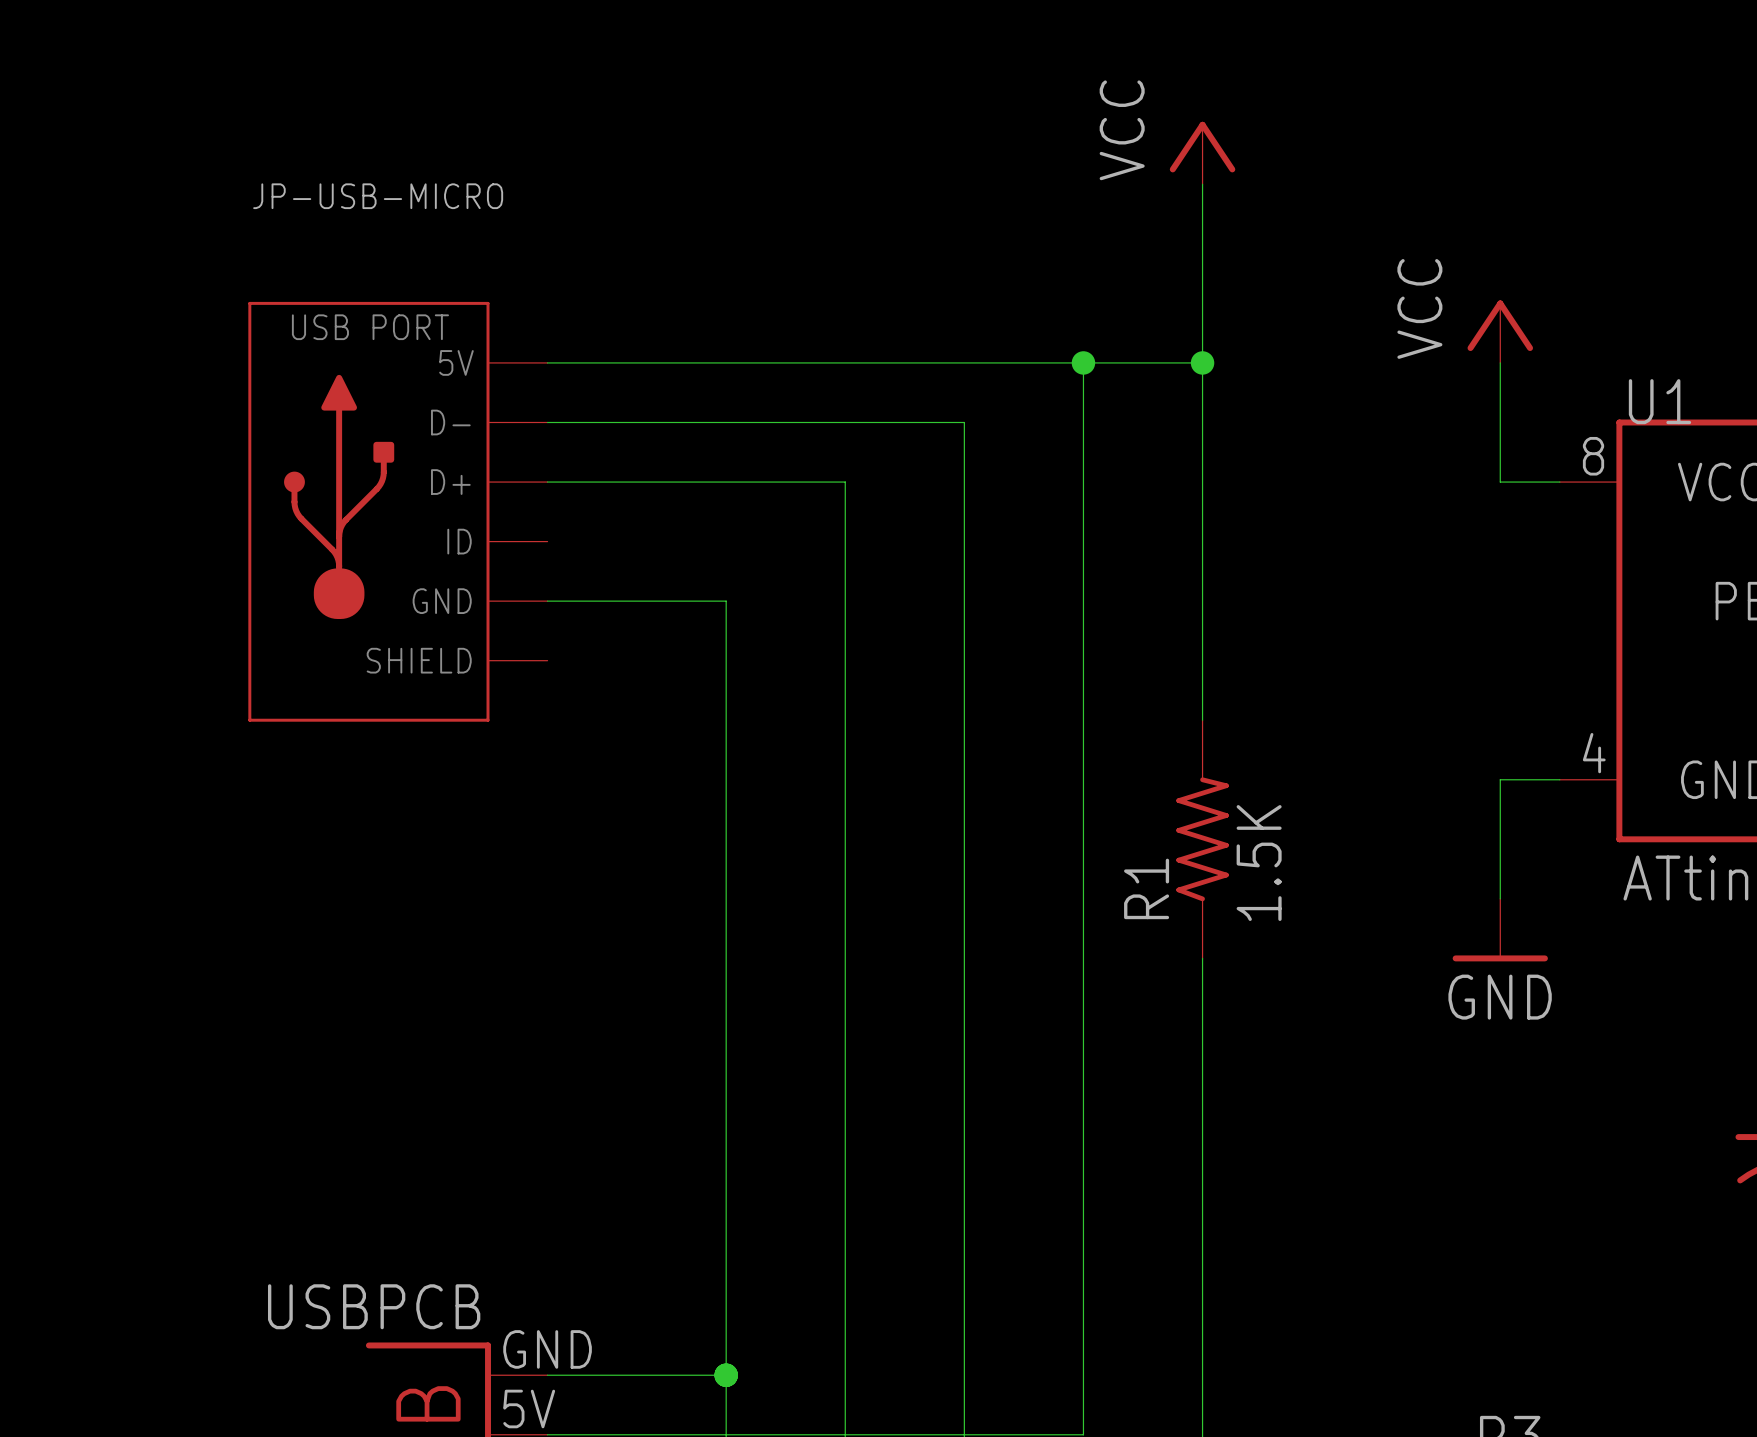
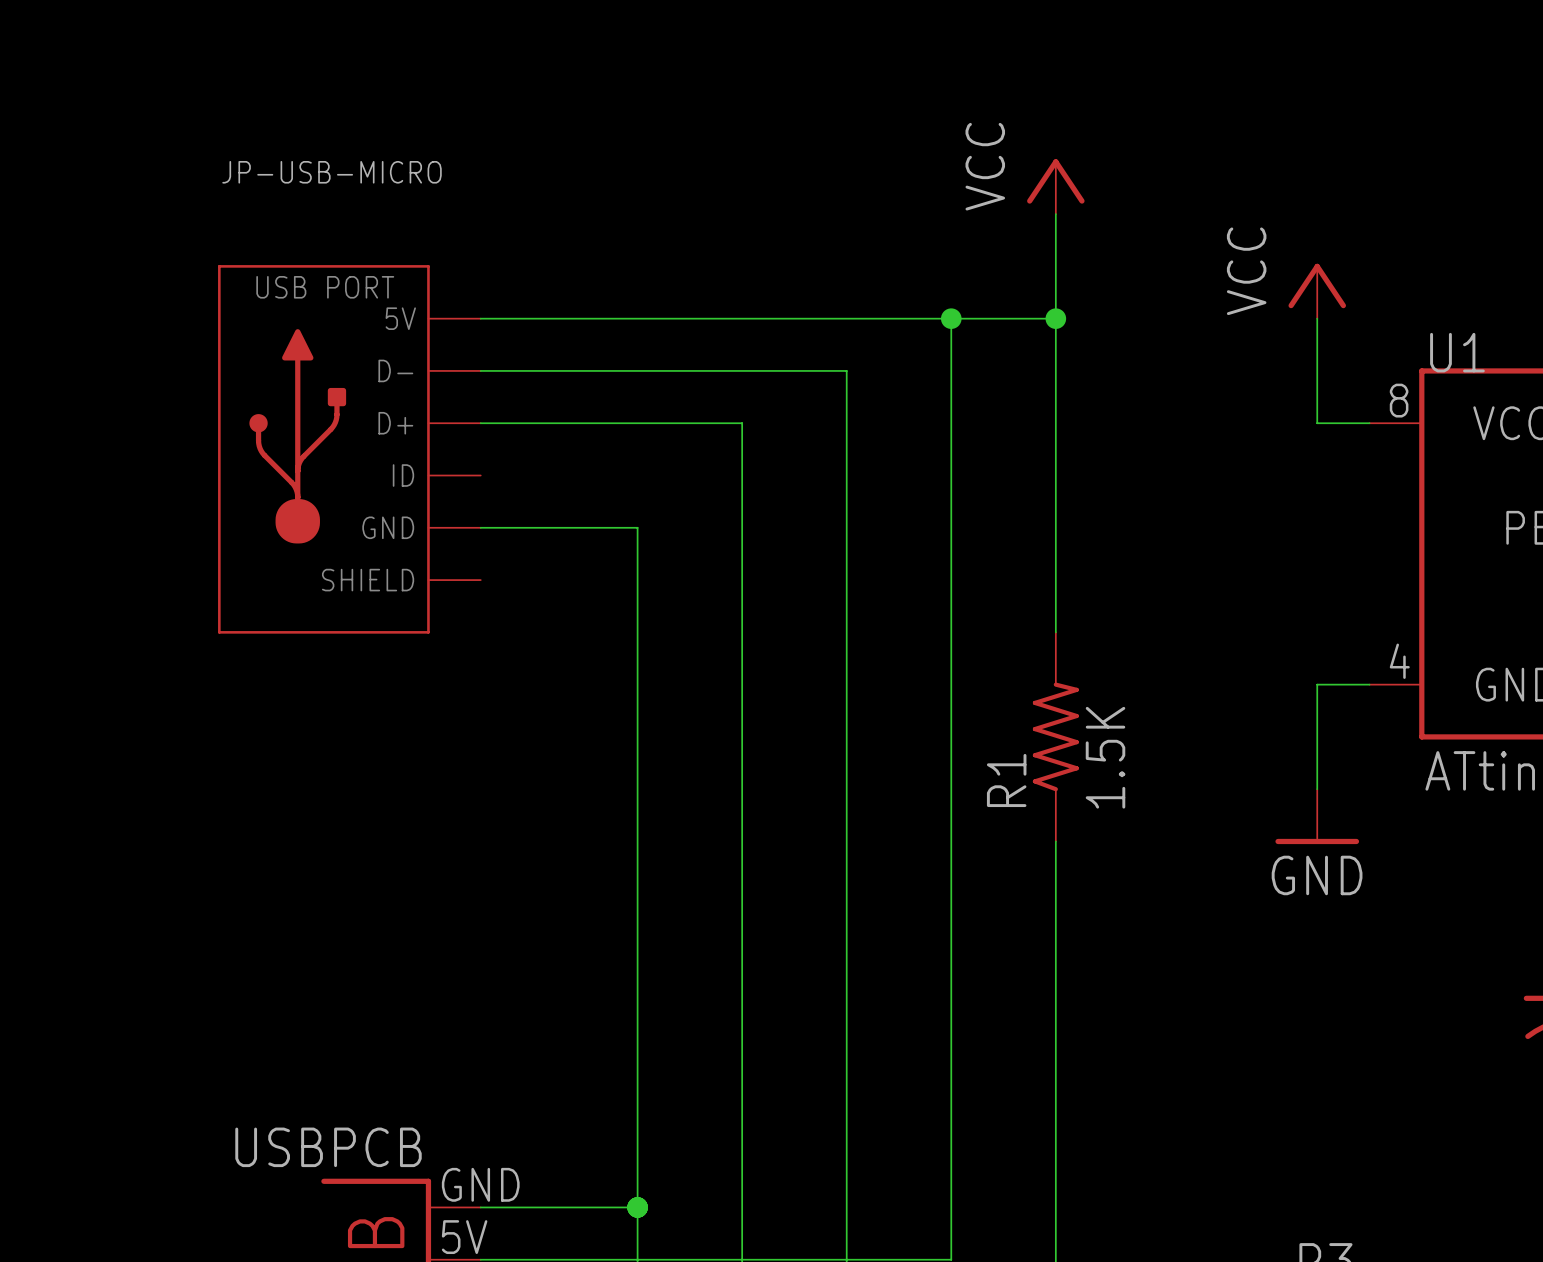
power symbol position: VCC (1202, 153) -> VCC (1055, 186)

